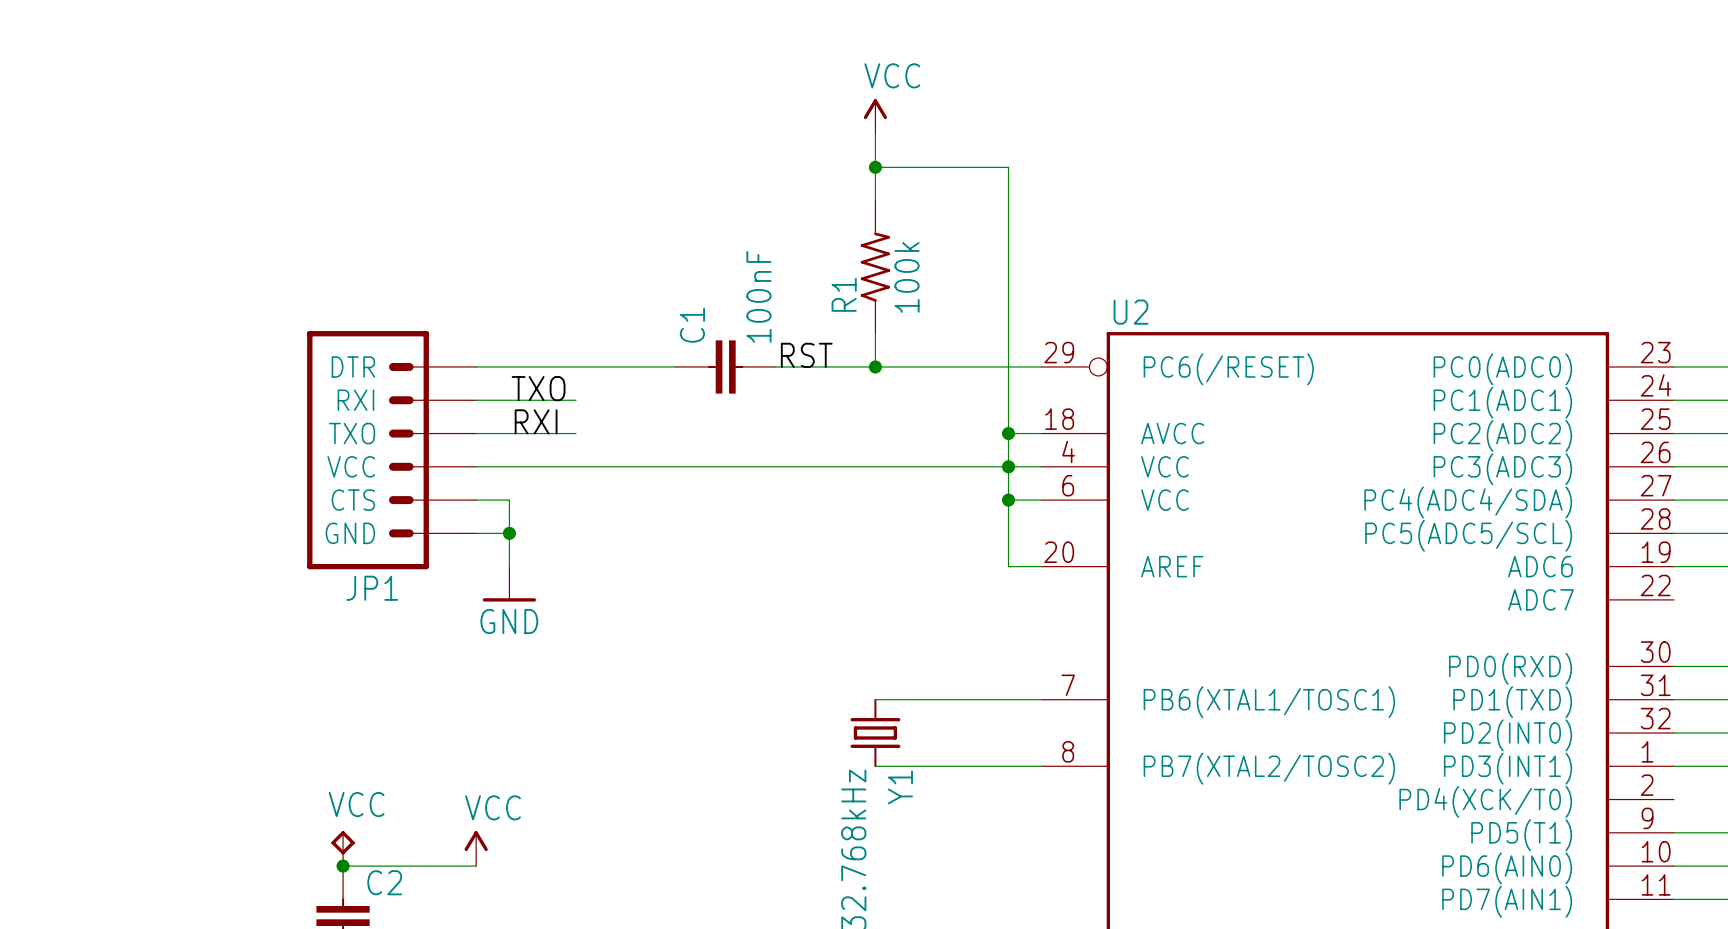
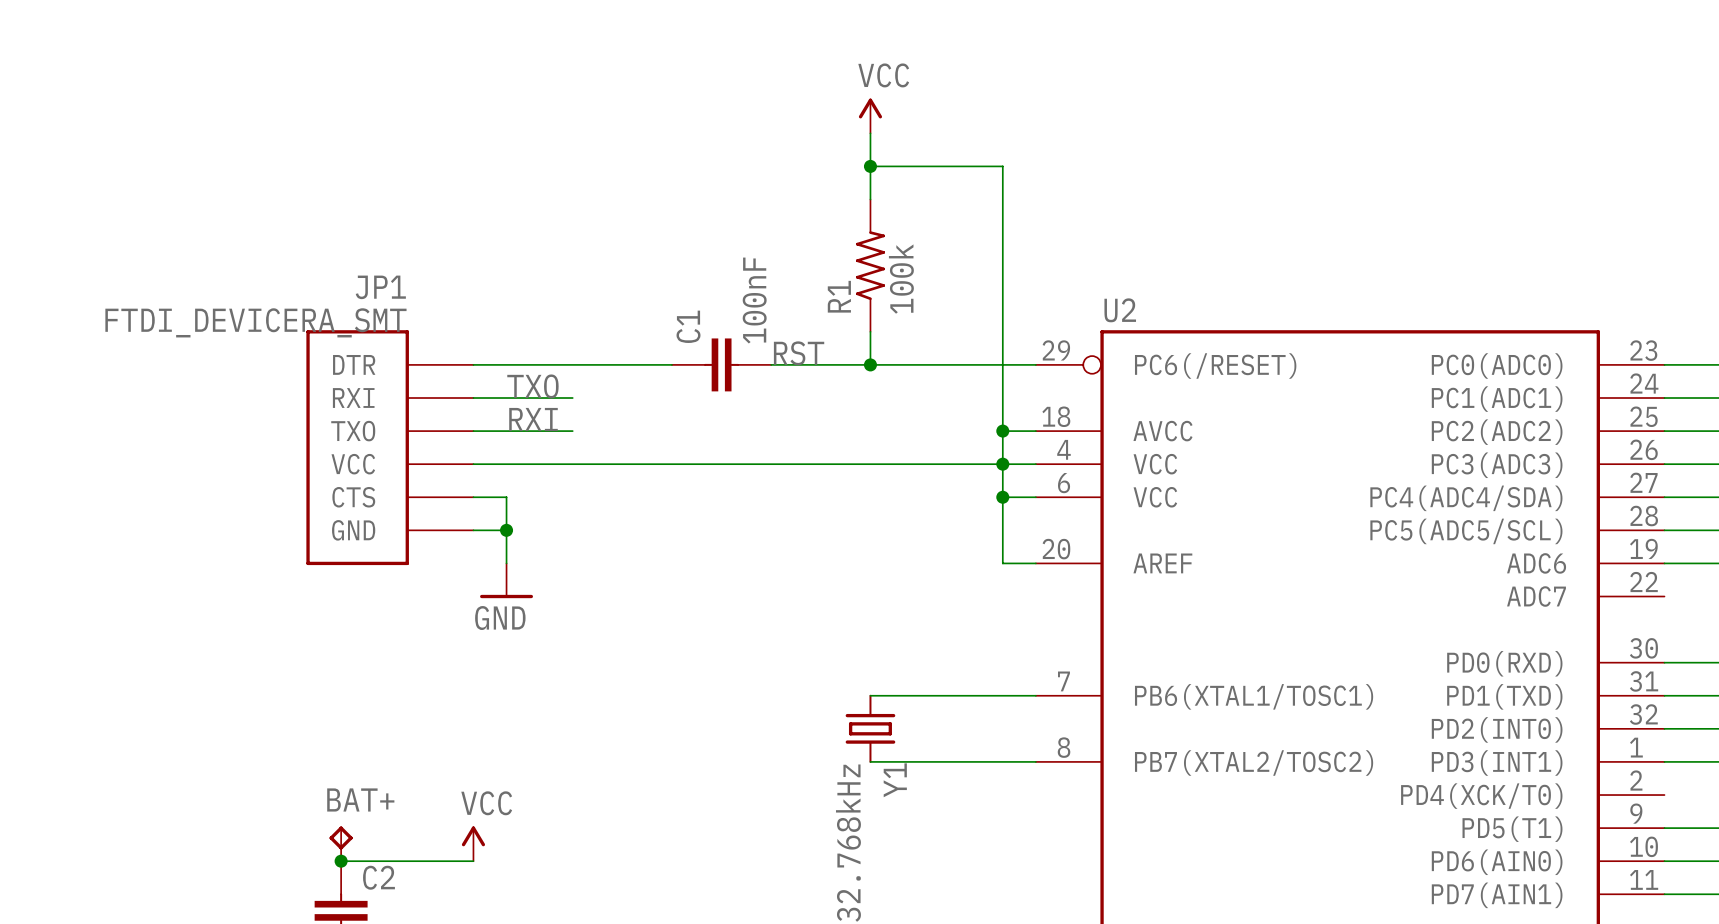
JP1 value: none -> FTDI_DEVICERA_SMT (255, 322)
JP1 symbol: [307, 331, 477, 570] -> [306, 330, 474, 566]
JP1 name position: JP1 (372, 588) -> JP1 (380, 287)
VCC name: VCC (356, 804) -> BAT+ (360, 799)

